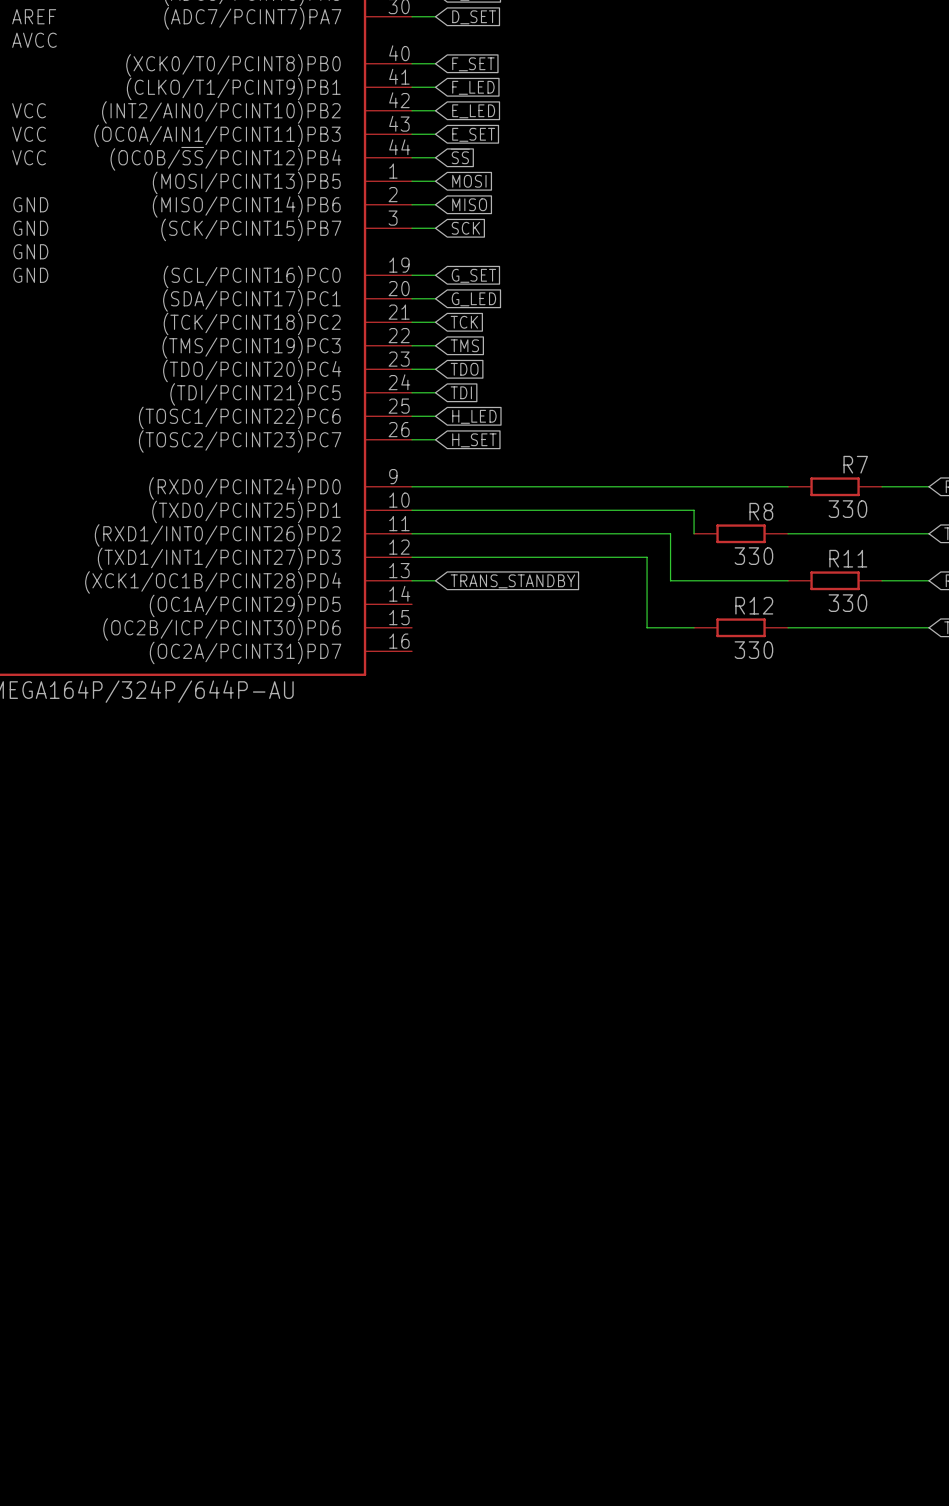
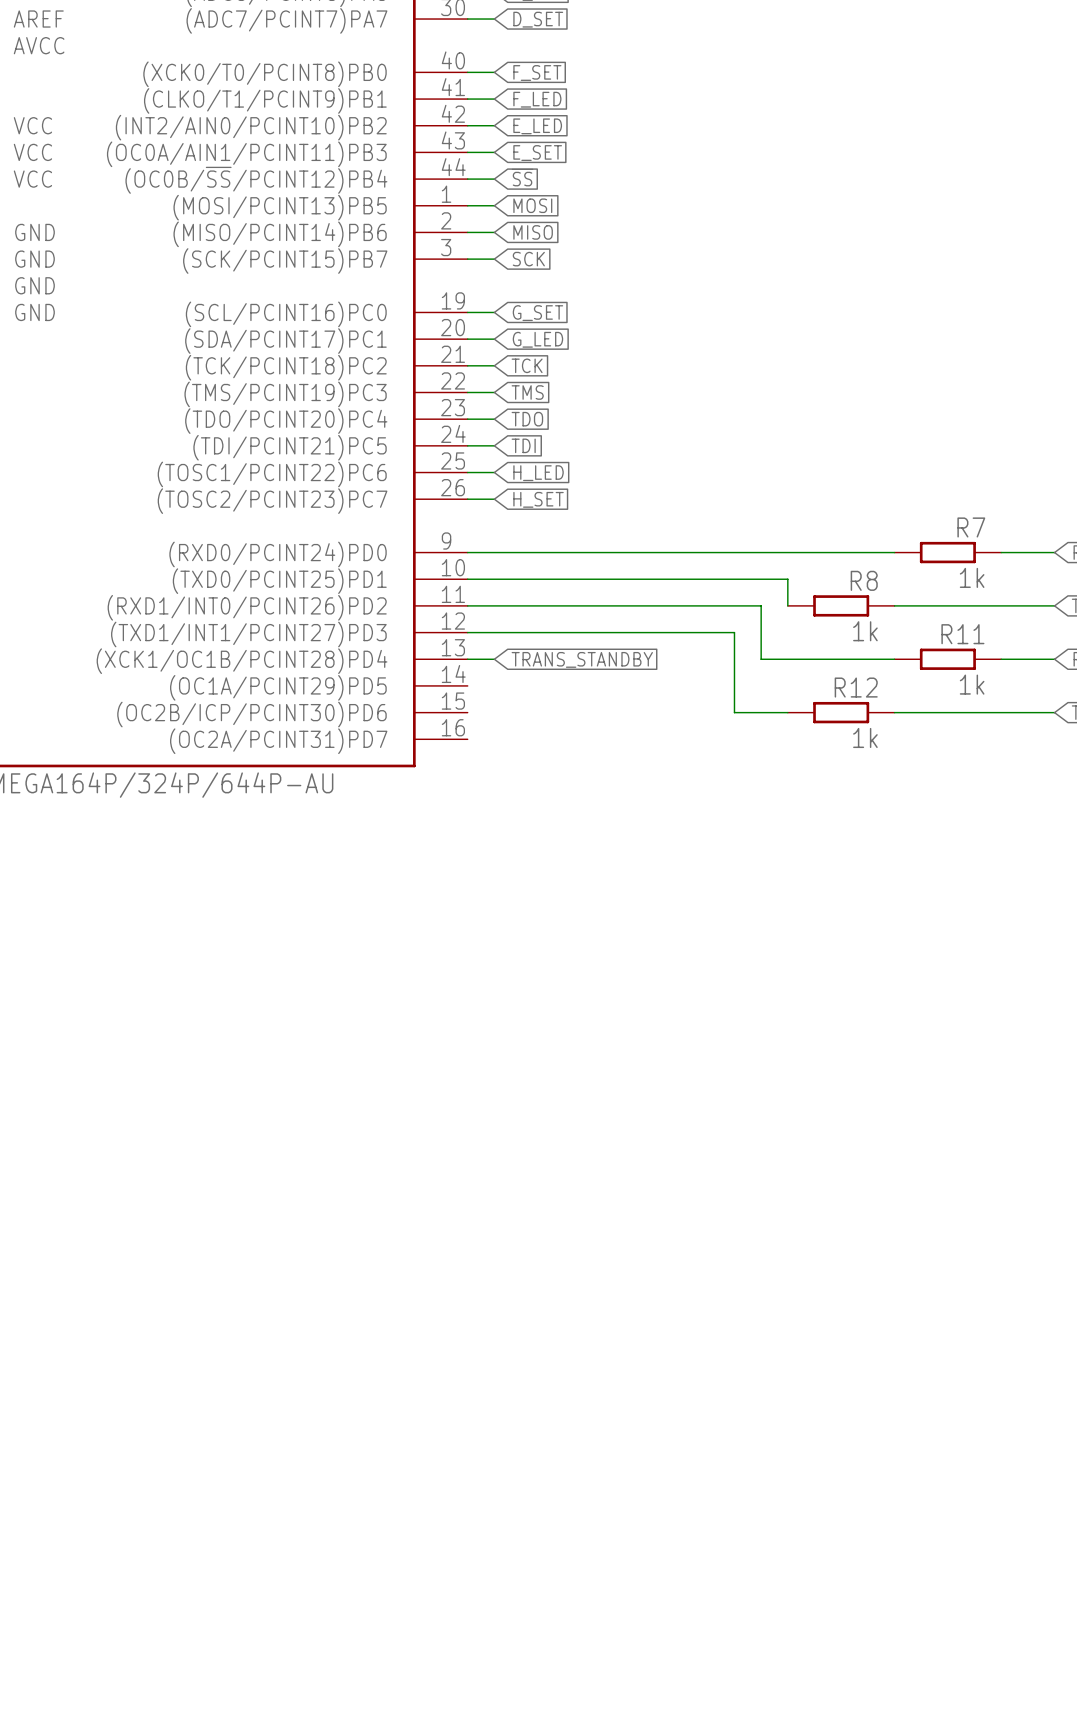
R7 value: 330 (847, 509) -> 1k (972, 577)
R8 value: 330 (753, 556) -> 1k (865, 631)
R11 value: 330 (847, 603) -> 1k (972, 684)
R12 value: 330 (753, 650) -> 1k (865, 737)

